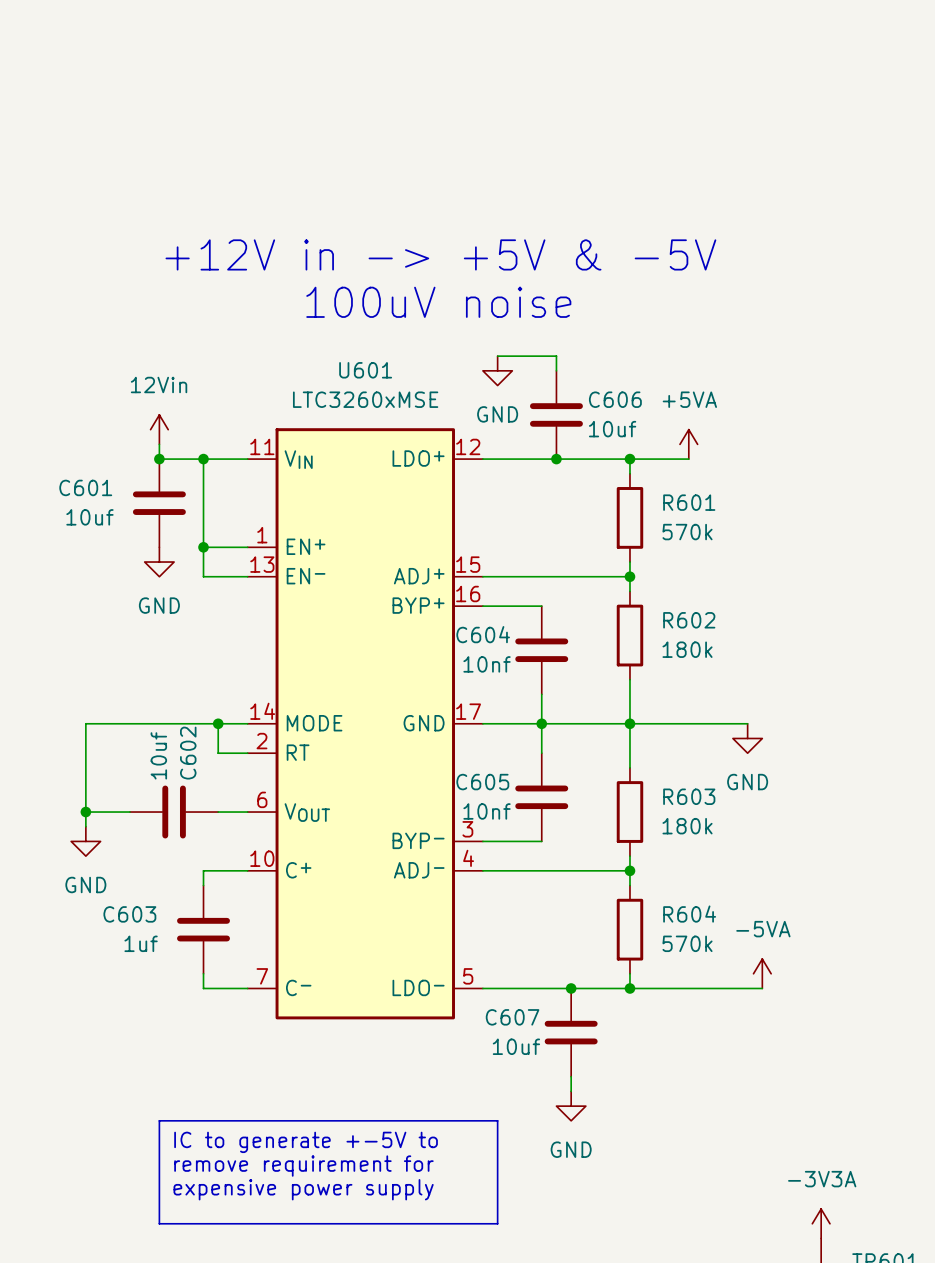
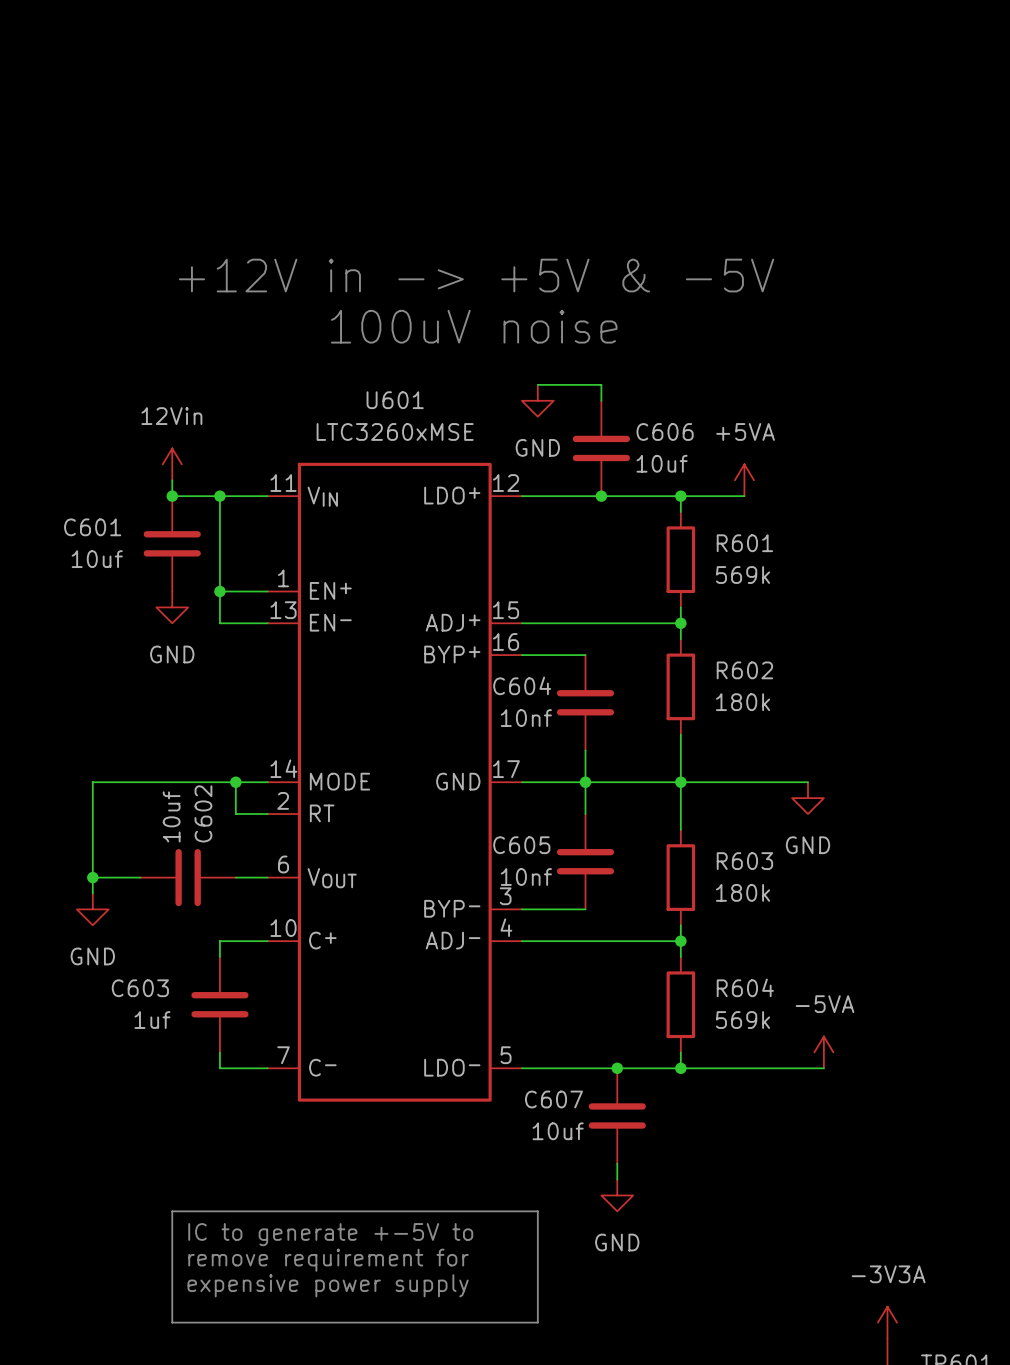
R601 value: 570k (687, 532) -> 569k (743, 575)
R604 value: 570k (687, 943) -> 569k (743, 1020)

